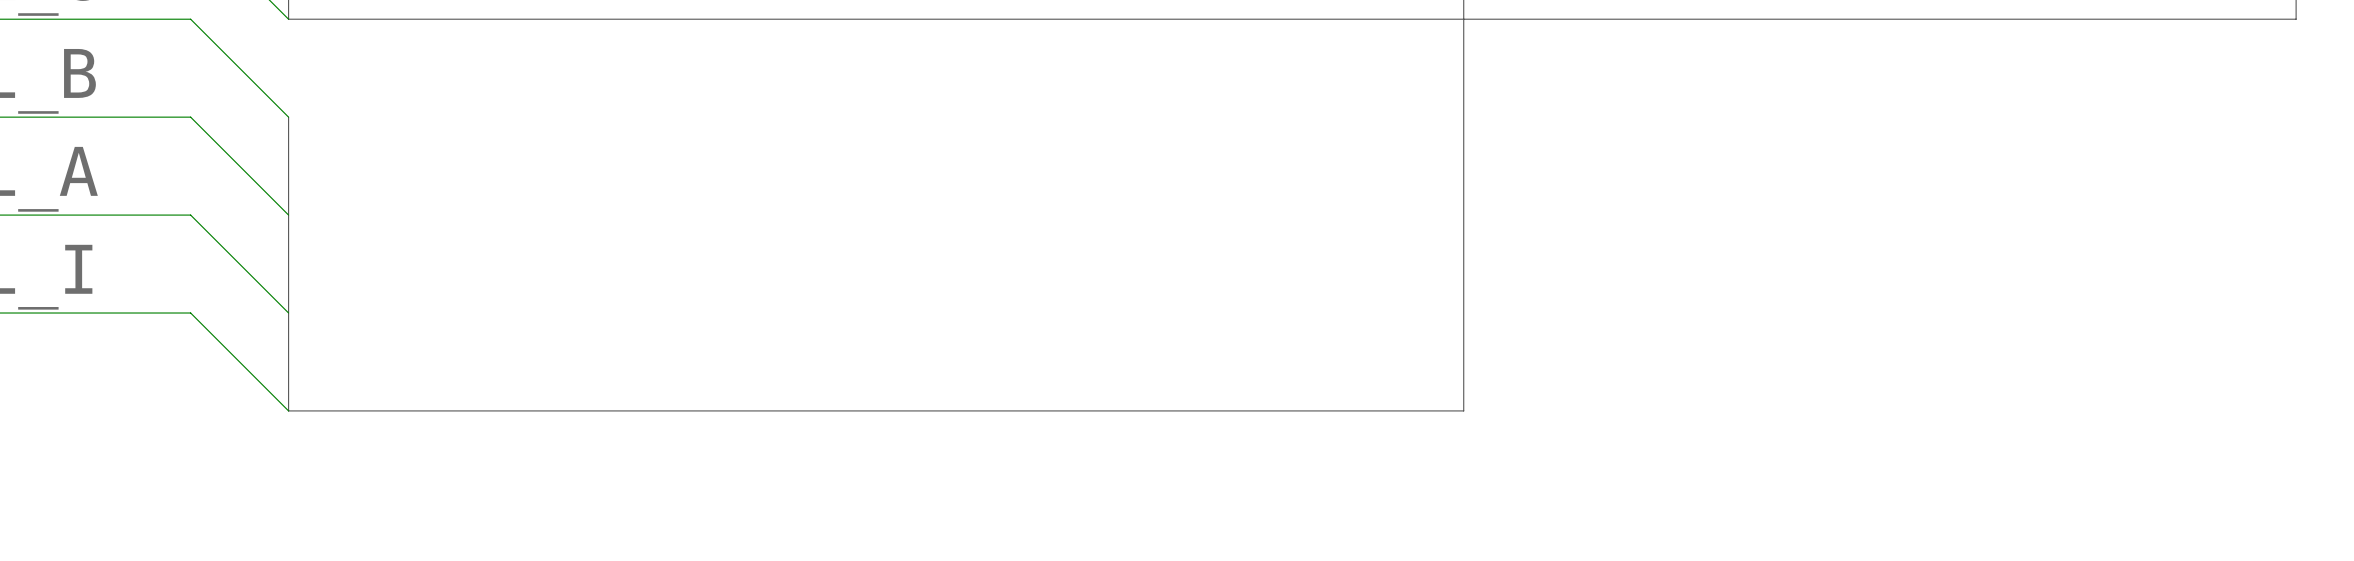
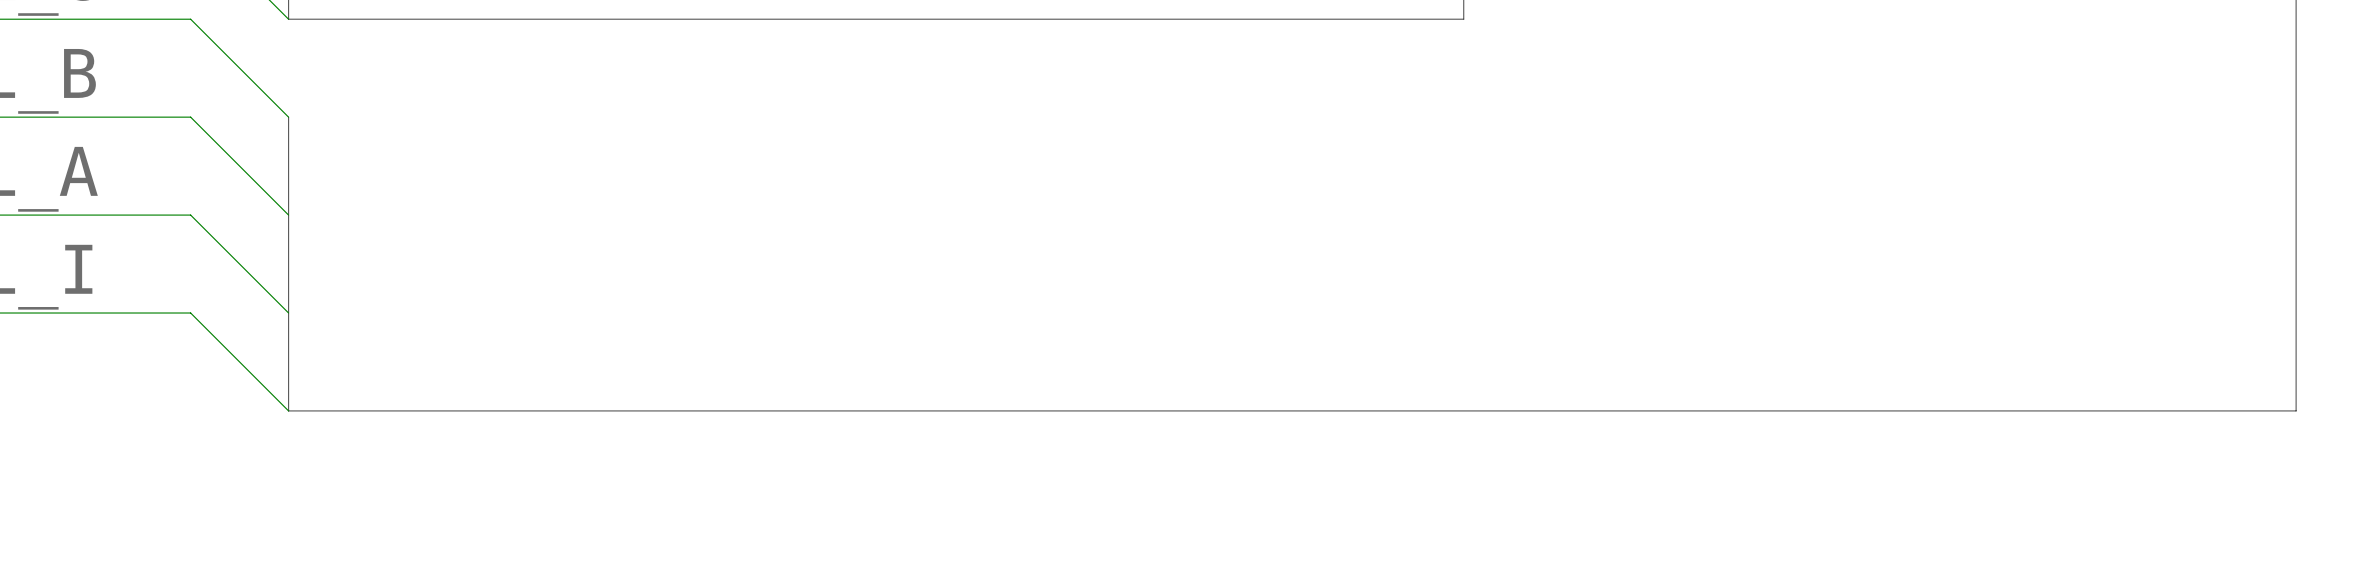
bus: (2296, 19) (1463, 19) (1463, 410) -> (2296, 19) (2296, 410) (1463, 410)

